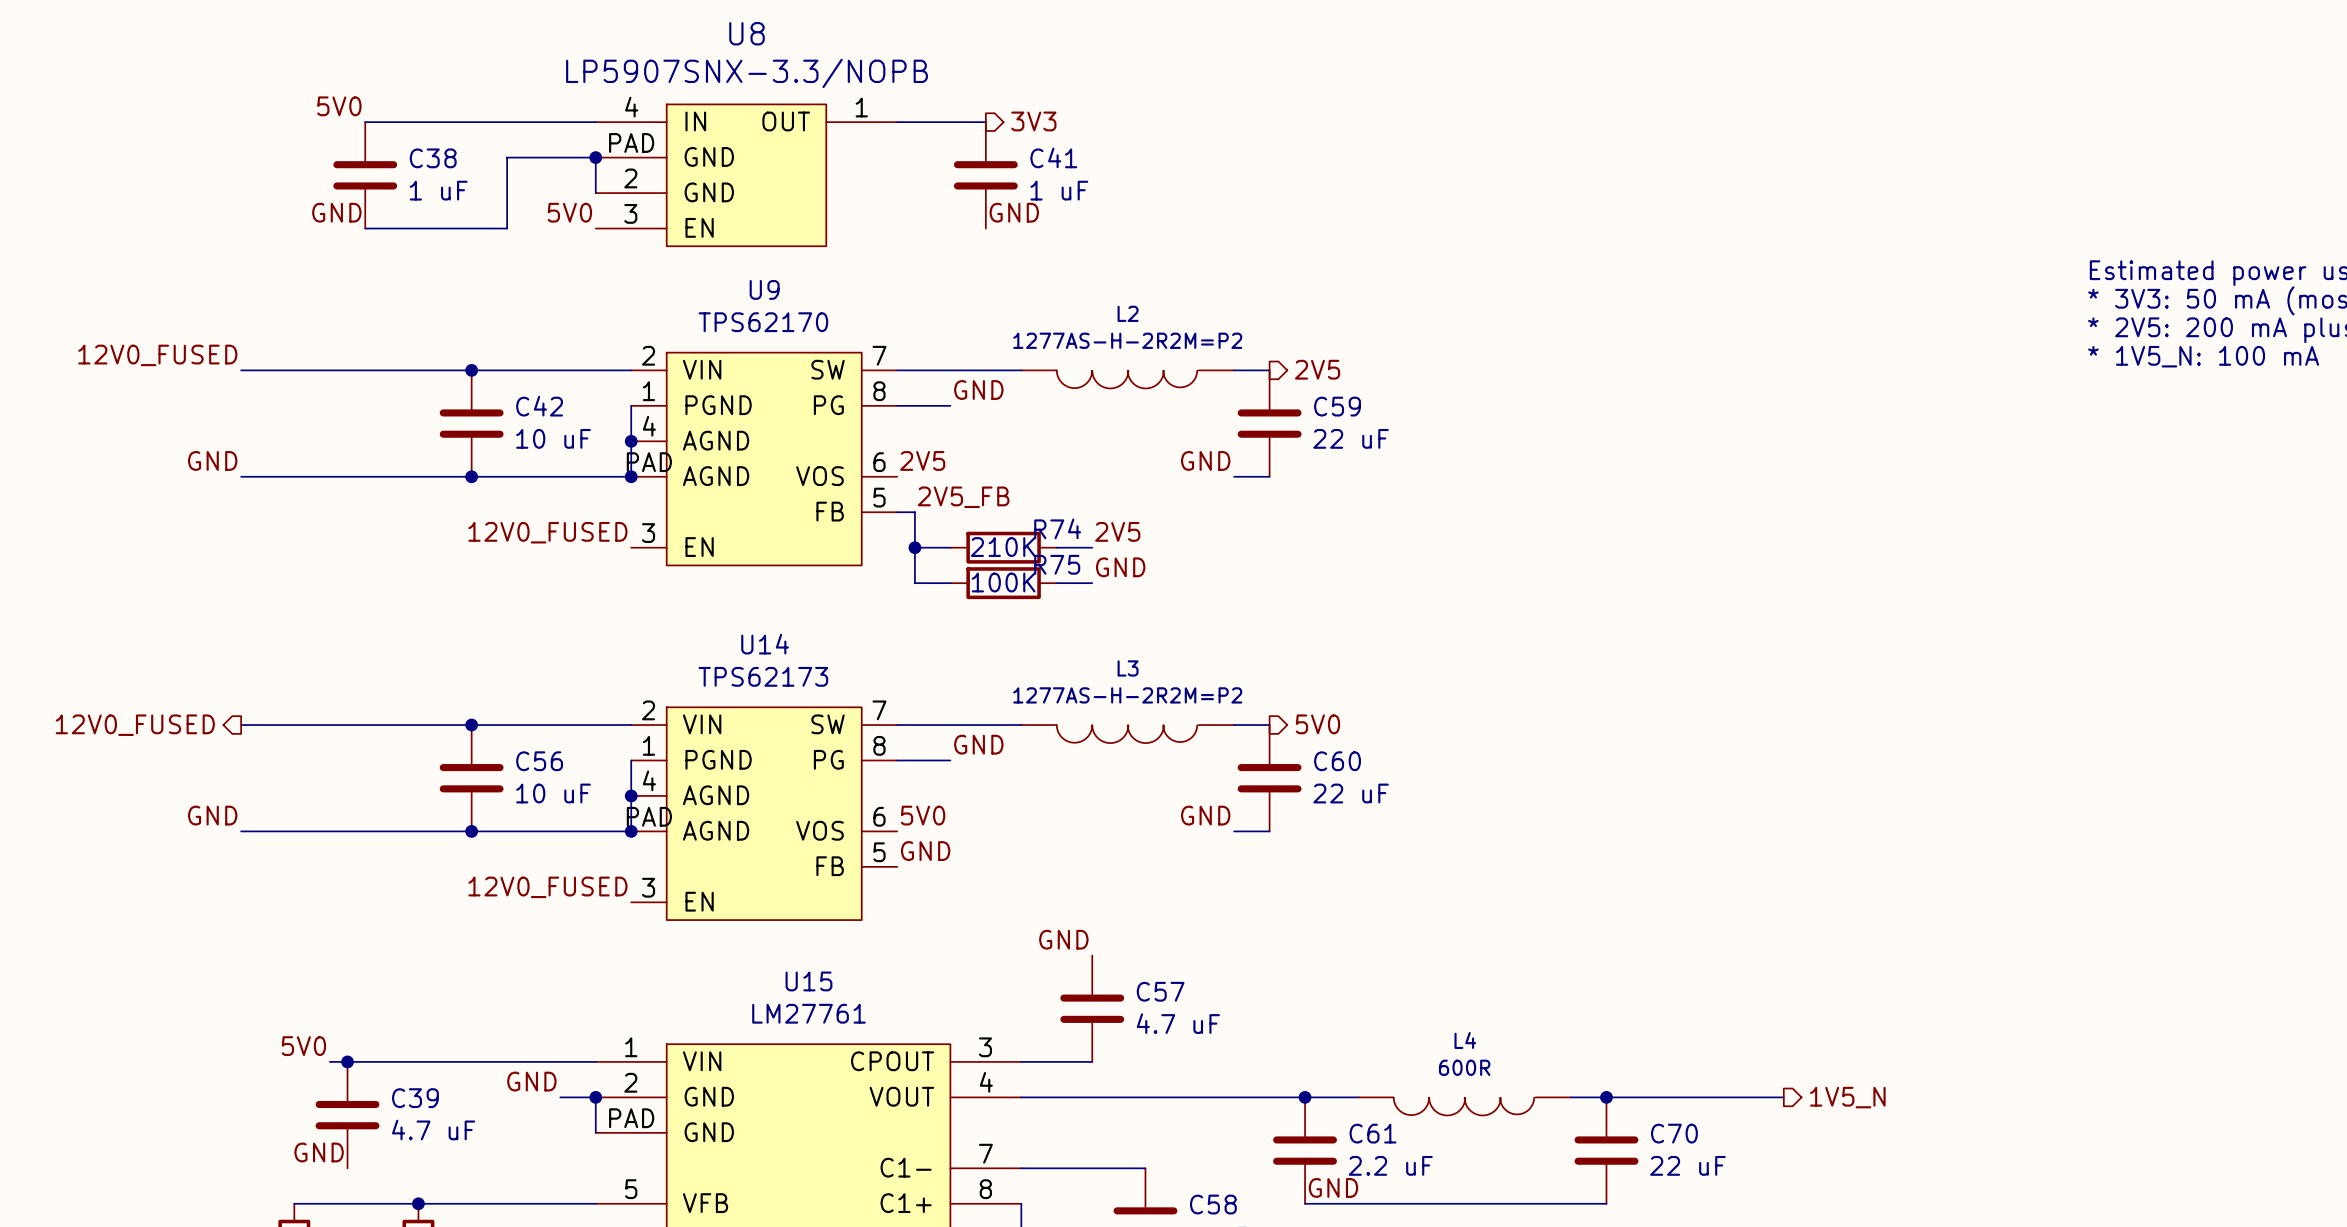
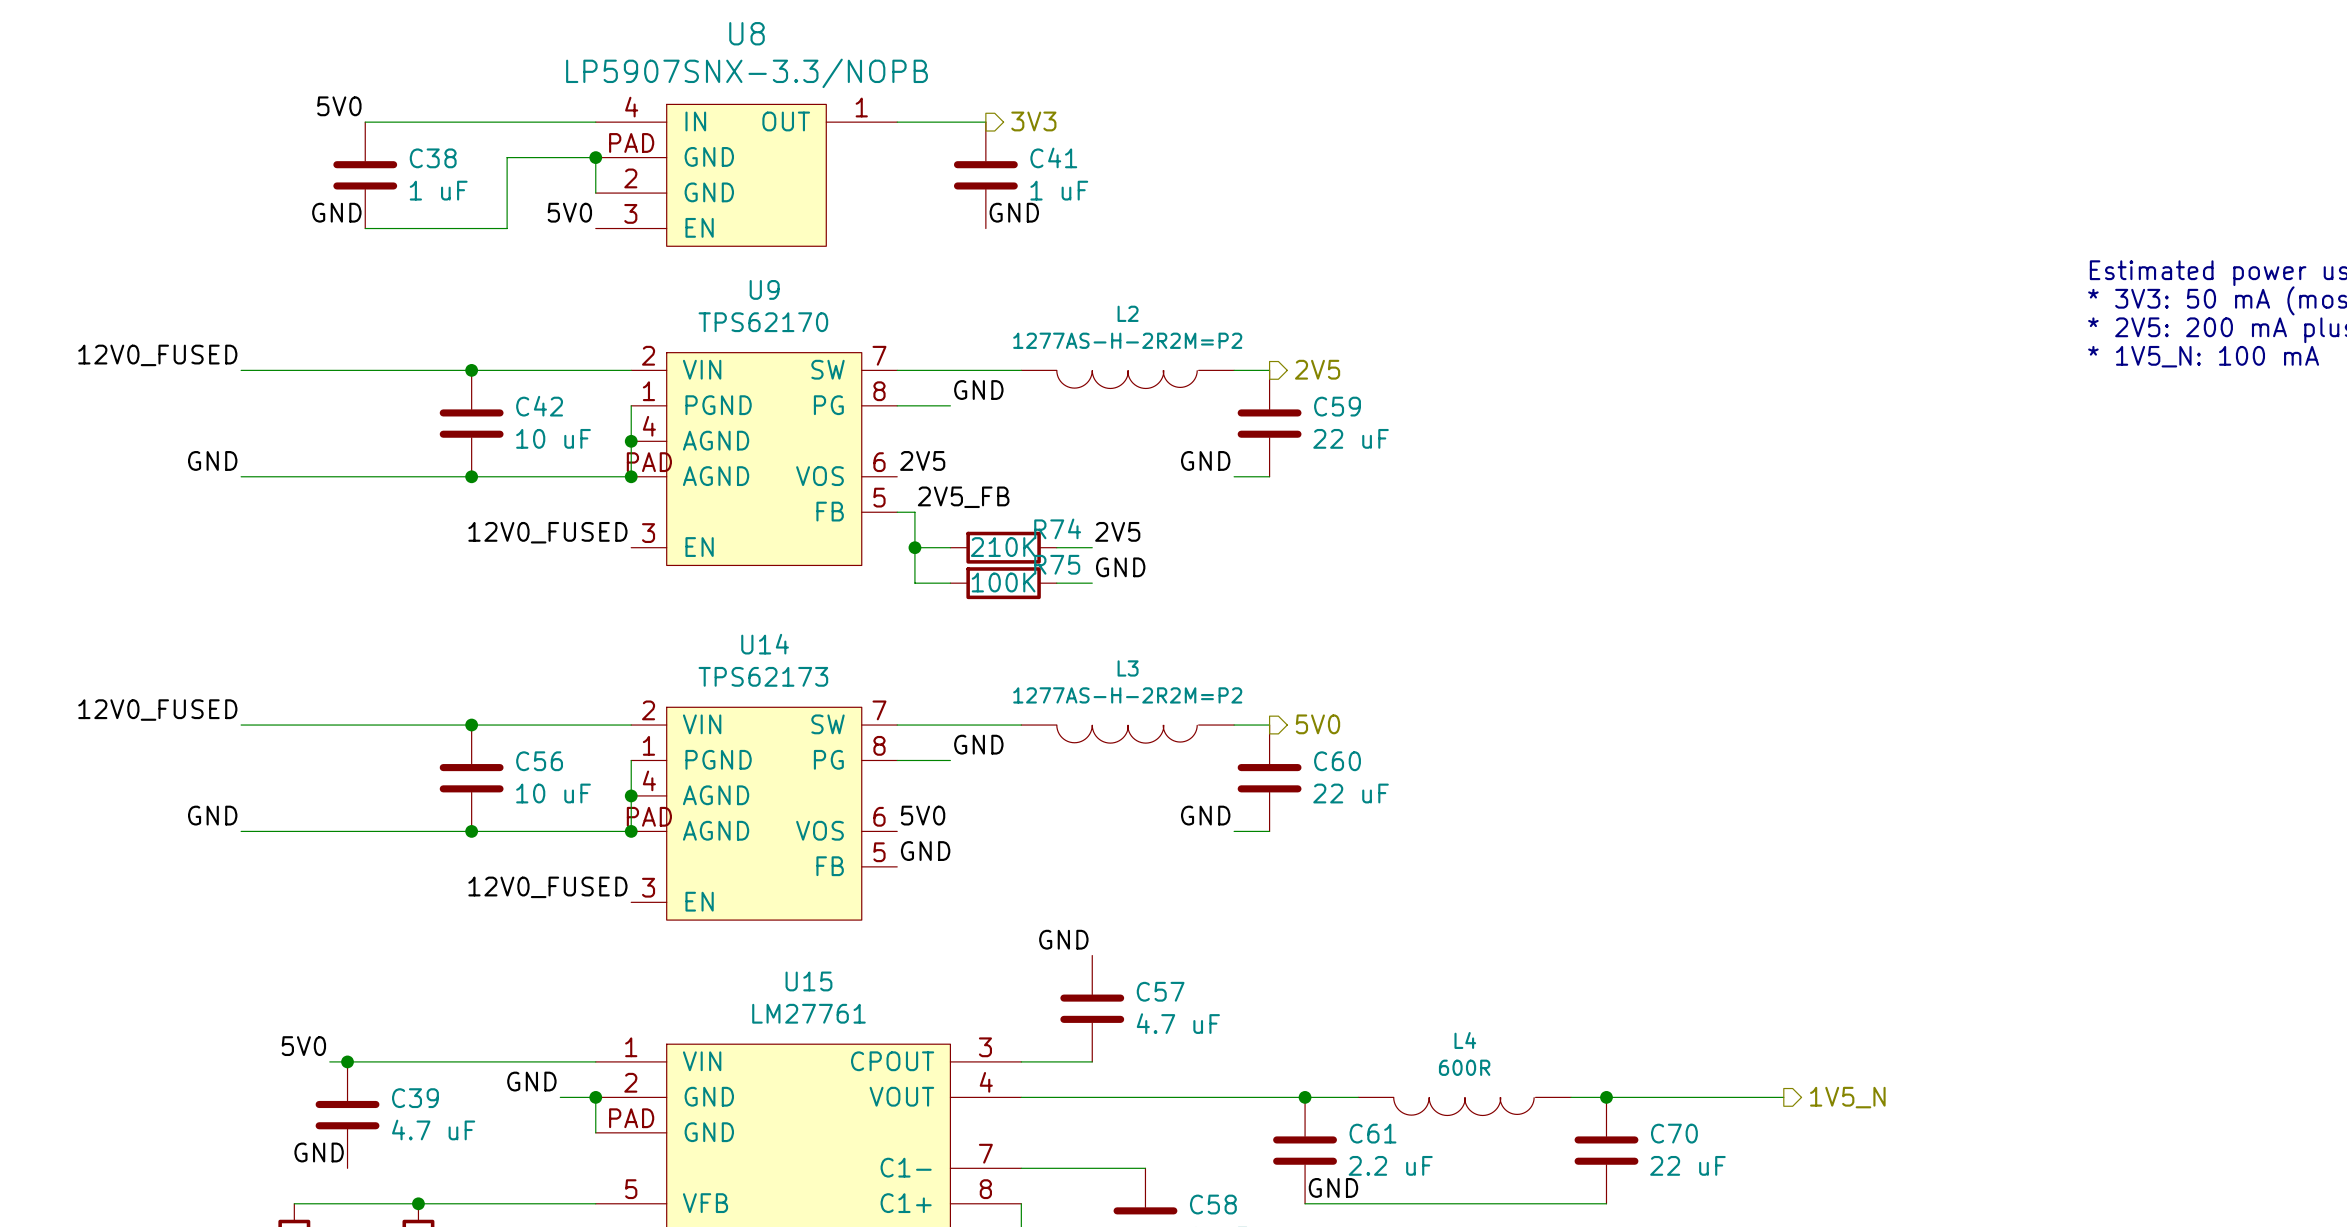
label: none -> 12V0_FUSED (157, 710)
hierarchical label: 12V0_FUSED (135, 725) -> none

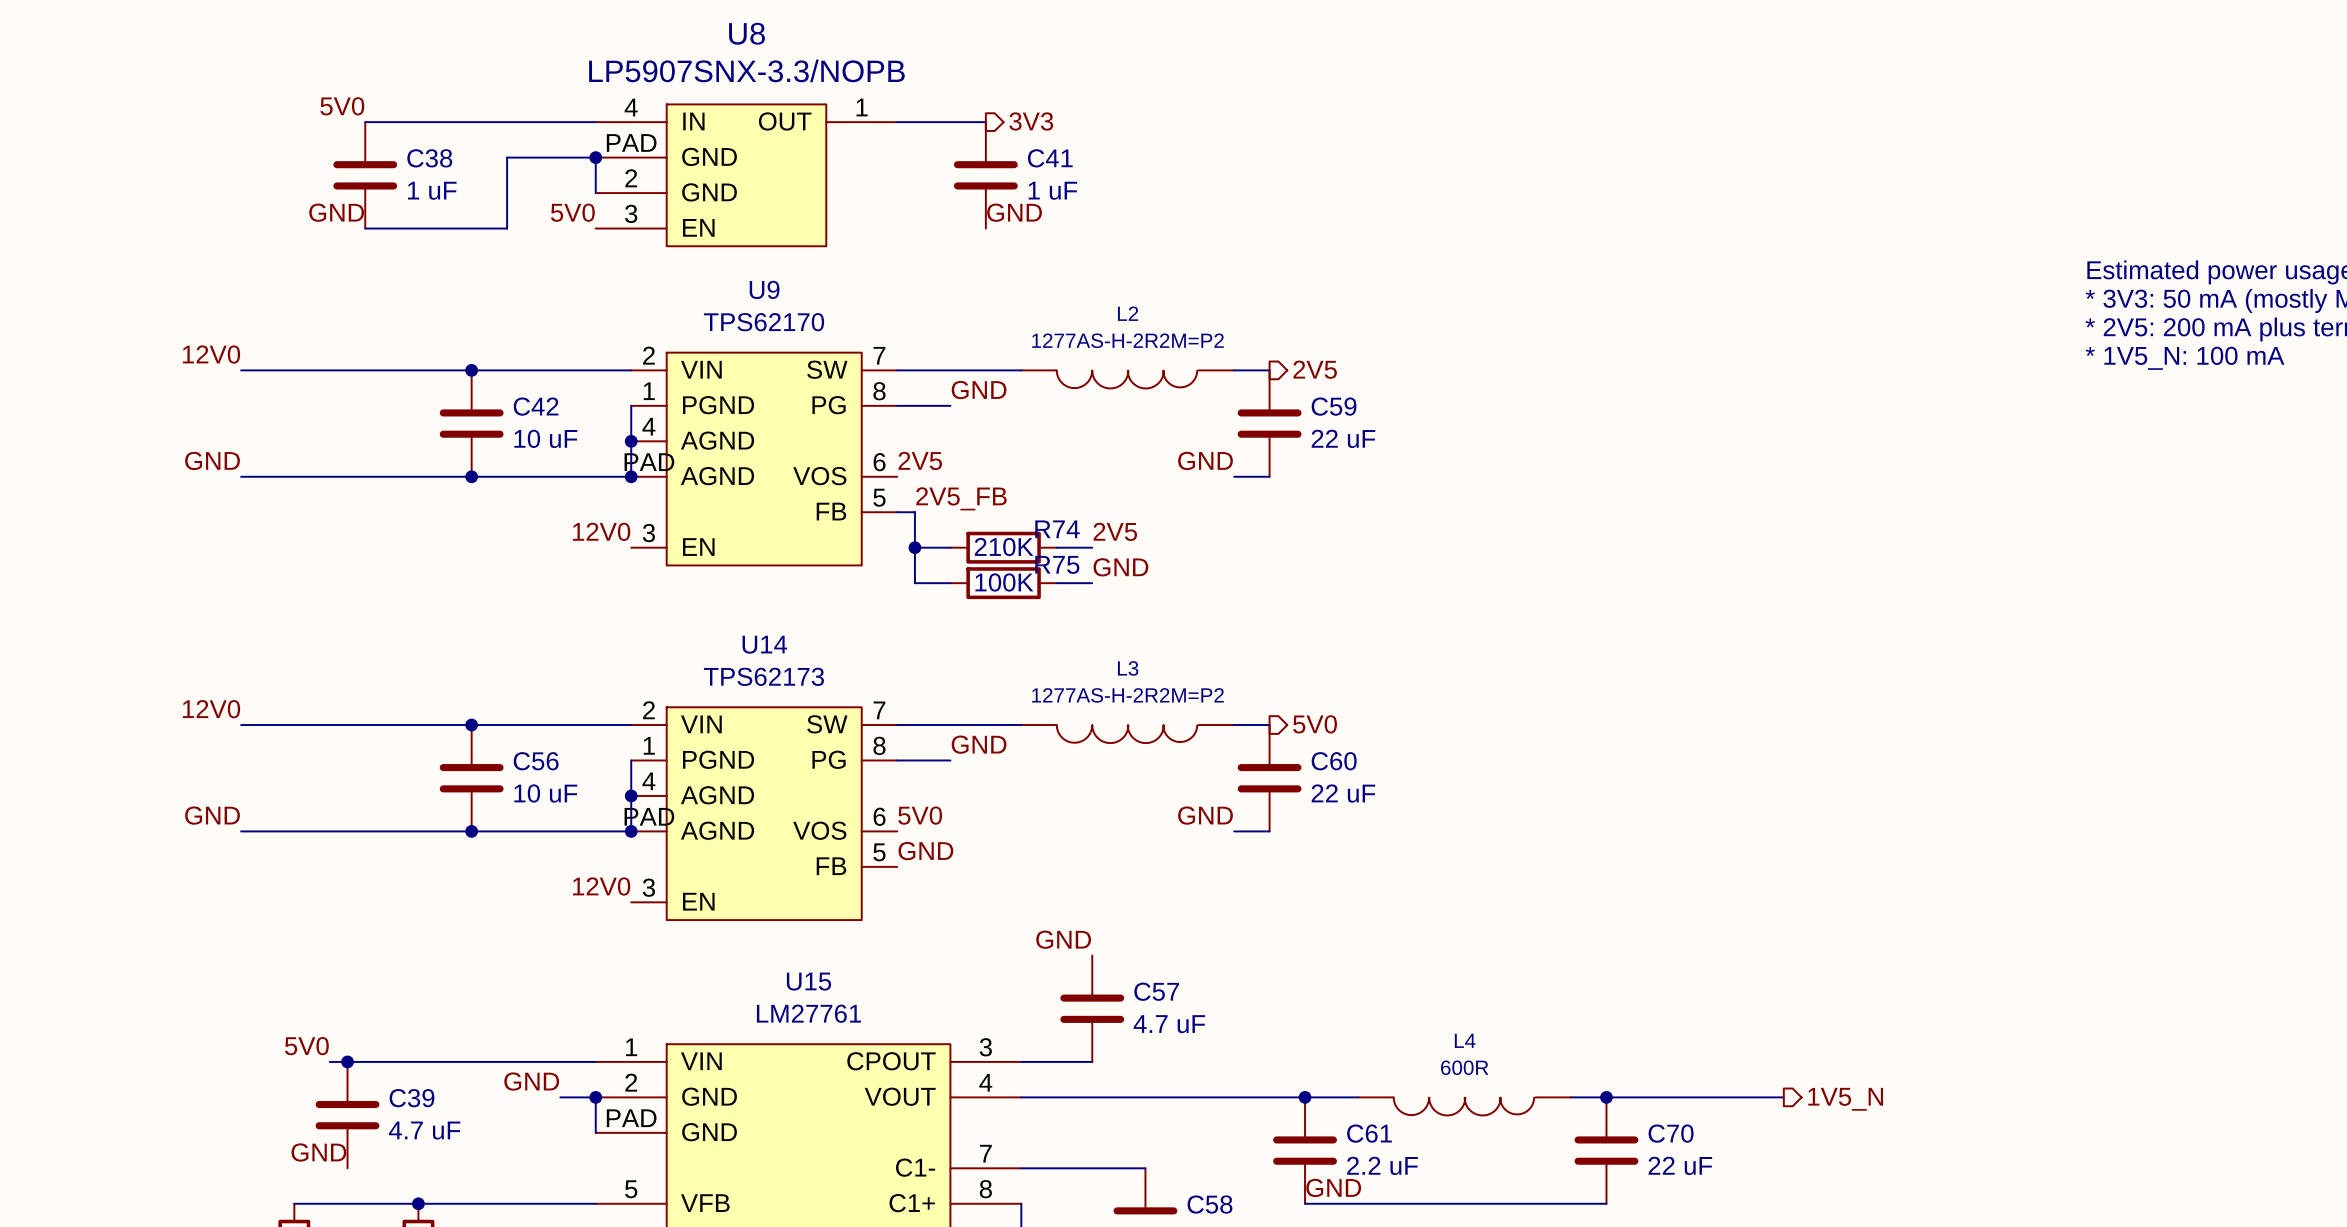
label: 12V0_FUSED (157, 355) -> 12V0 (211, 354)
label: 12V0_FUSED (547, 532) -> 12V0 (601, 531)
label: 12V0_FUSED (157, 710) -> 12V0 (211, 709)
label: 12V0_FUSED (547, 887) -> 12V0 (601, 886)

